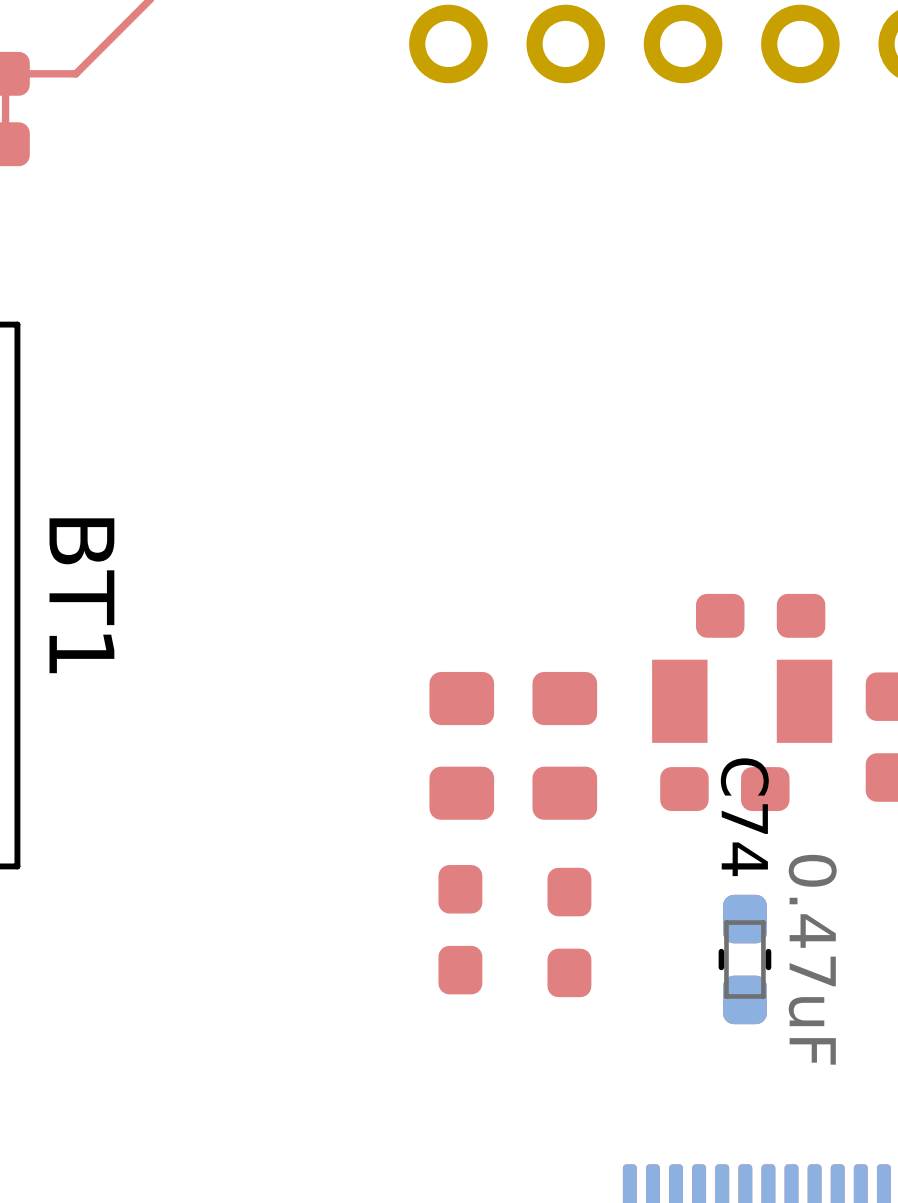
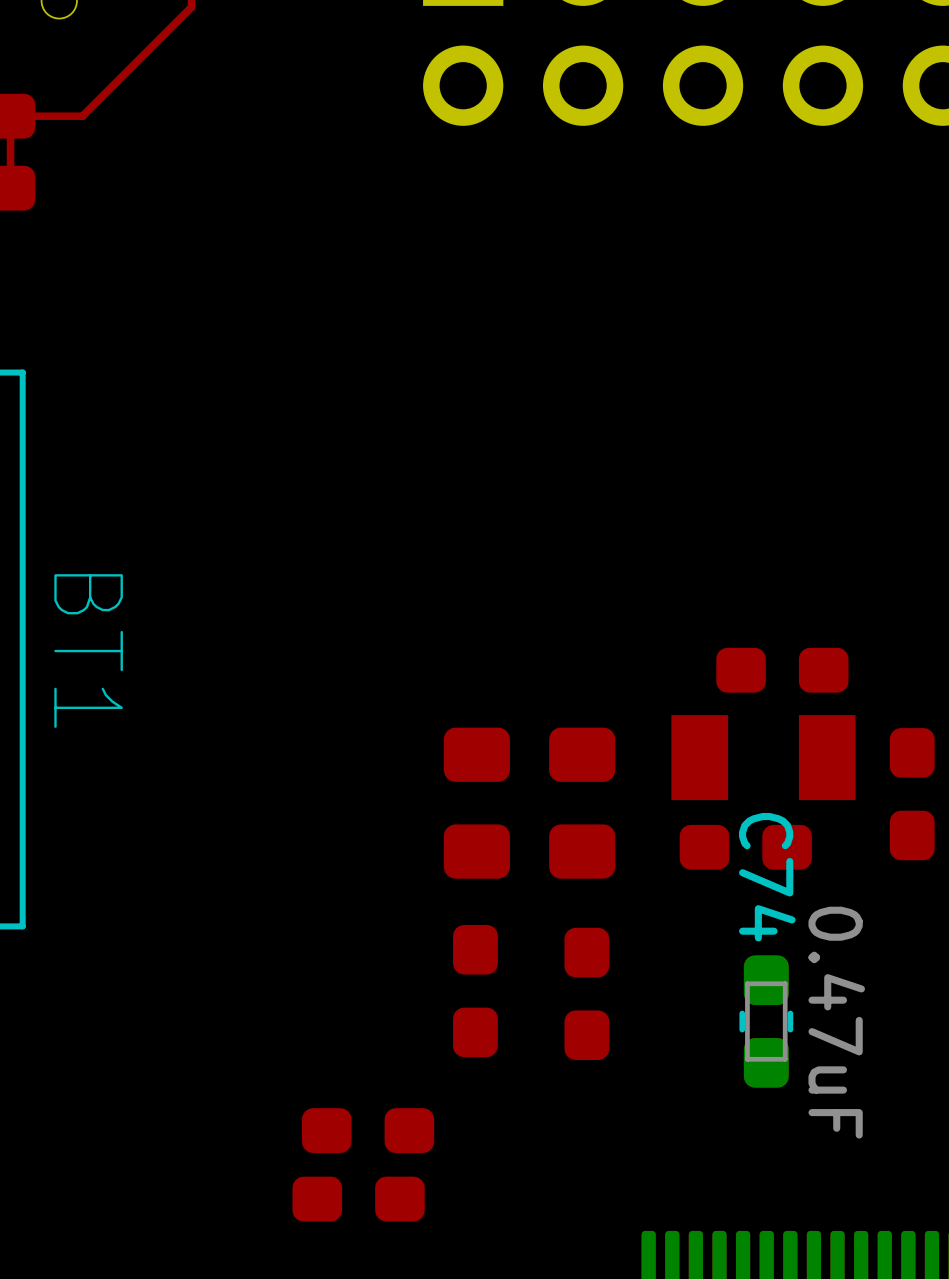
part: none -> (368, 1130)
part: none -> (358, 1199)

